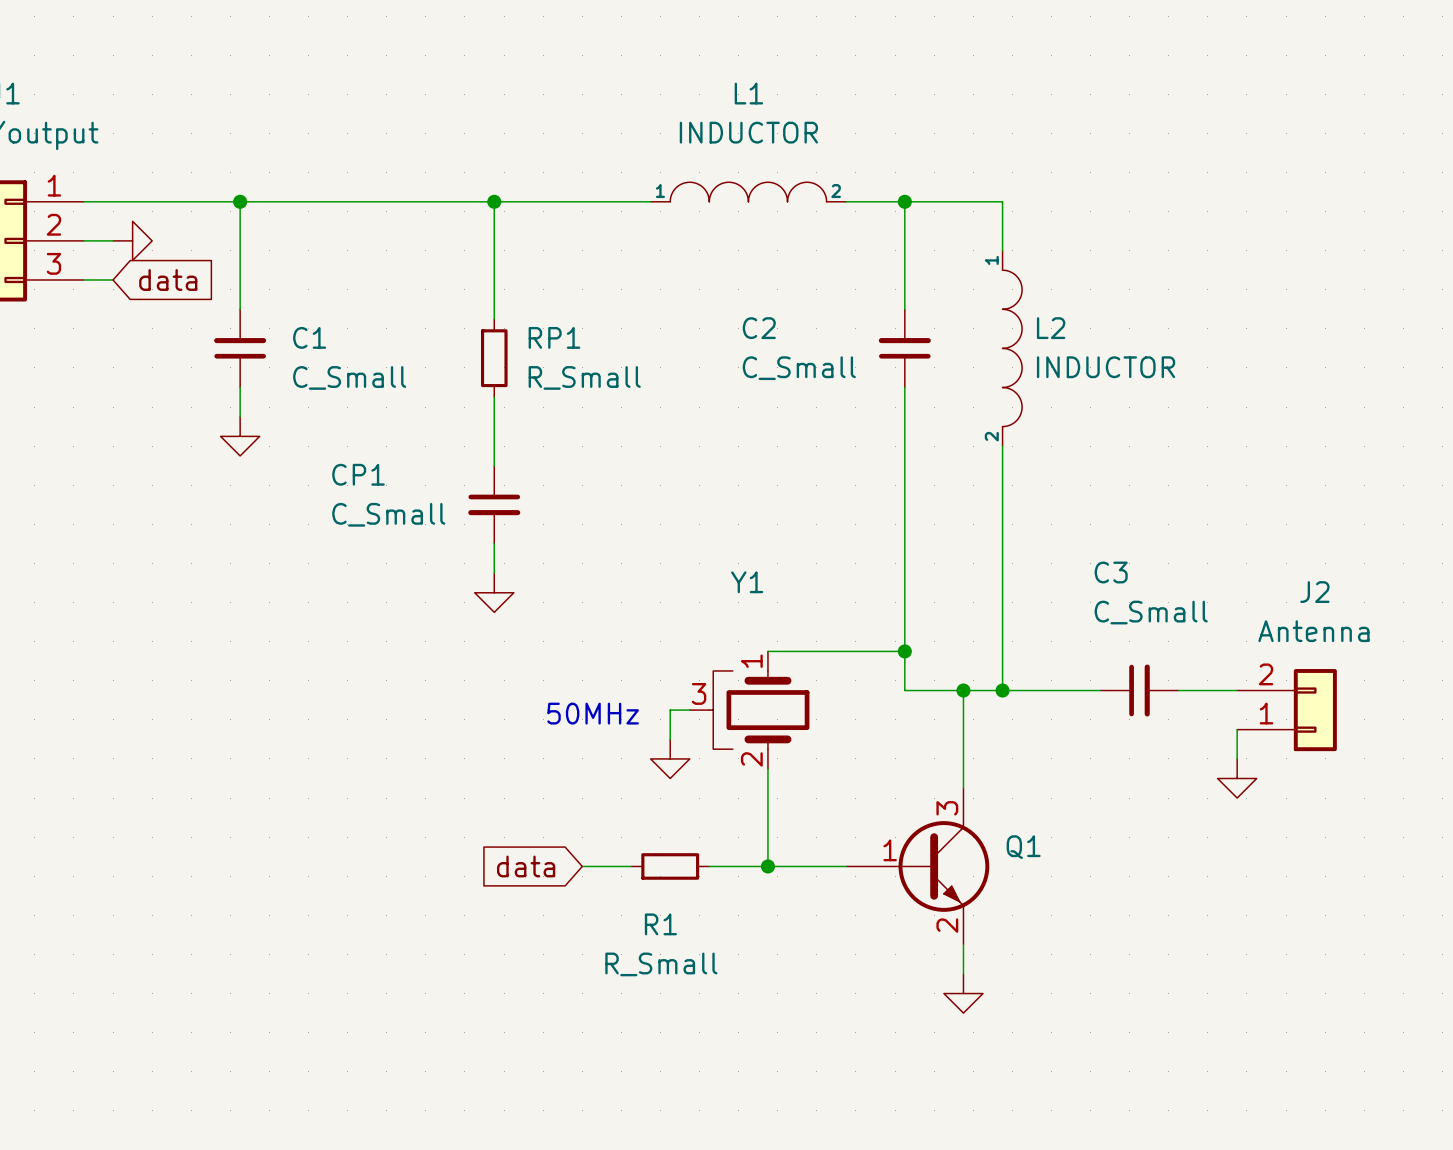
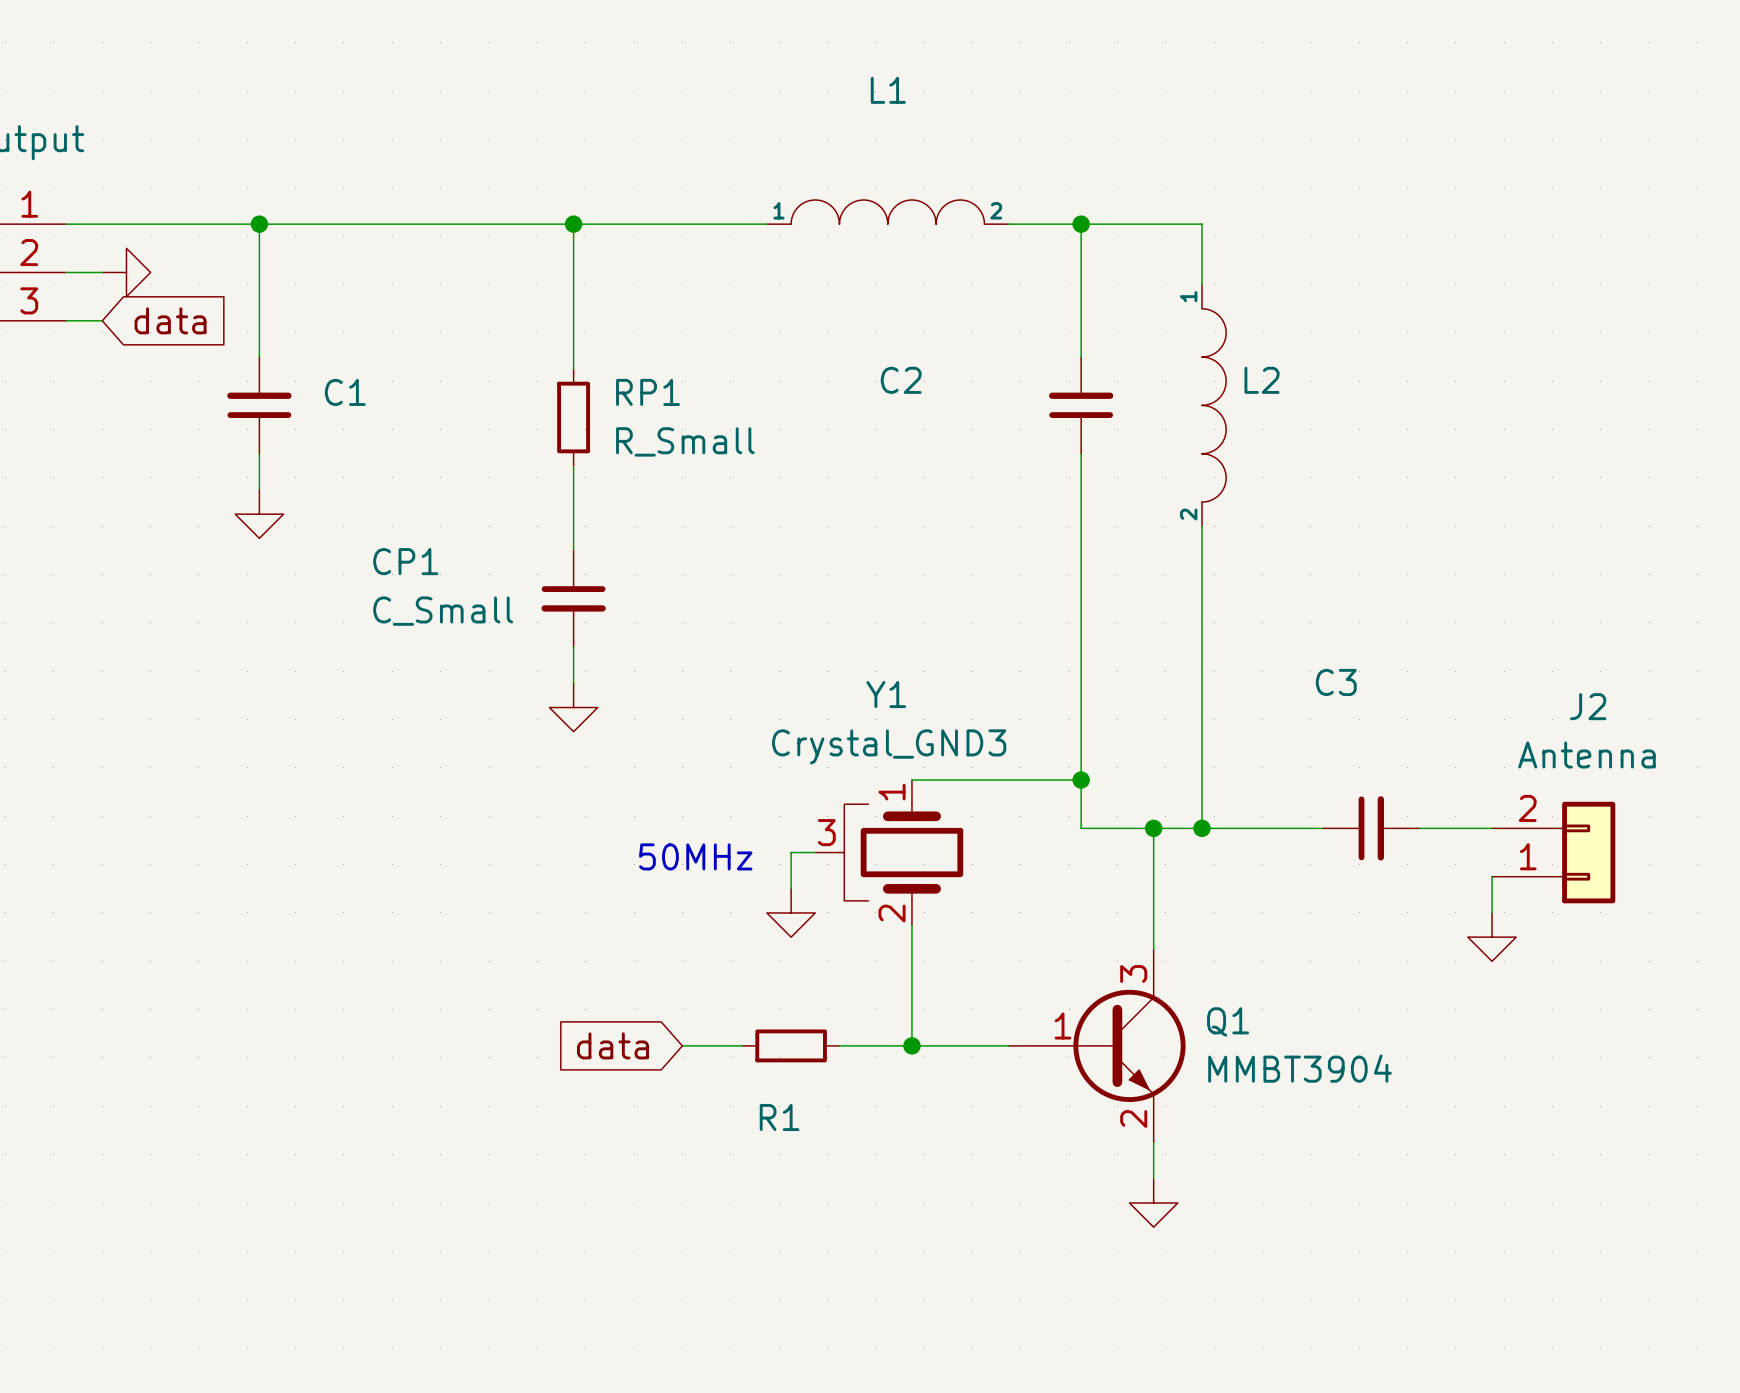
L1 value: INDUCTOR (748, 132) -> none
L2 value: INDUCTOR (1106, 367) -> none
C2 value: C_Small (799, 368) -> none
C1 value: C_Small (349, 377) -> none
C3 value: C_Small (1151, 612) -> none
Y1 value: none -> Crystal_GND3 (889, 746)
Q1 value: none -> MMBT3904 (1300, 1068)
R1 value: R_Small (661, 964) -> none

